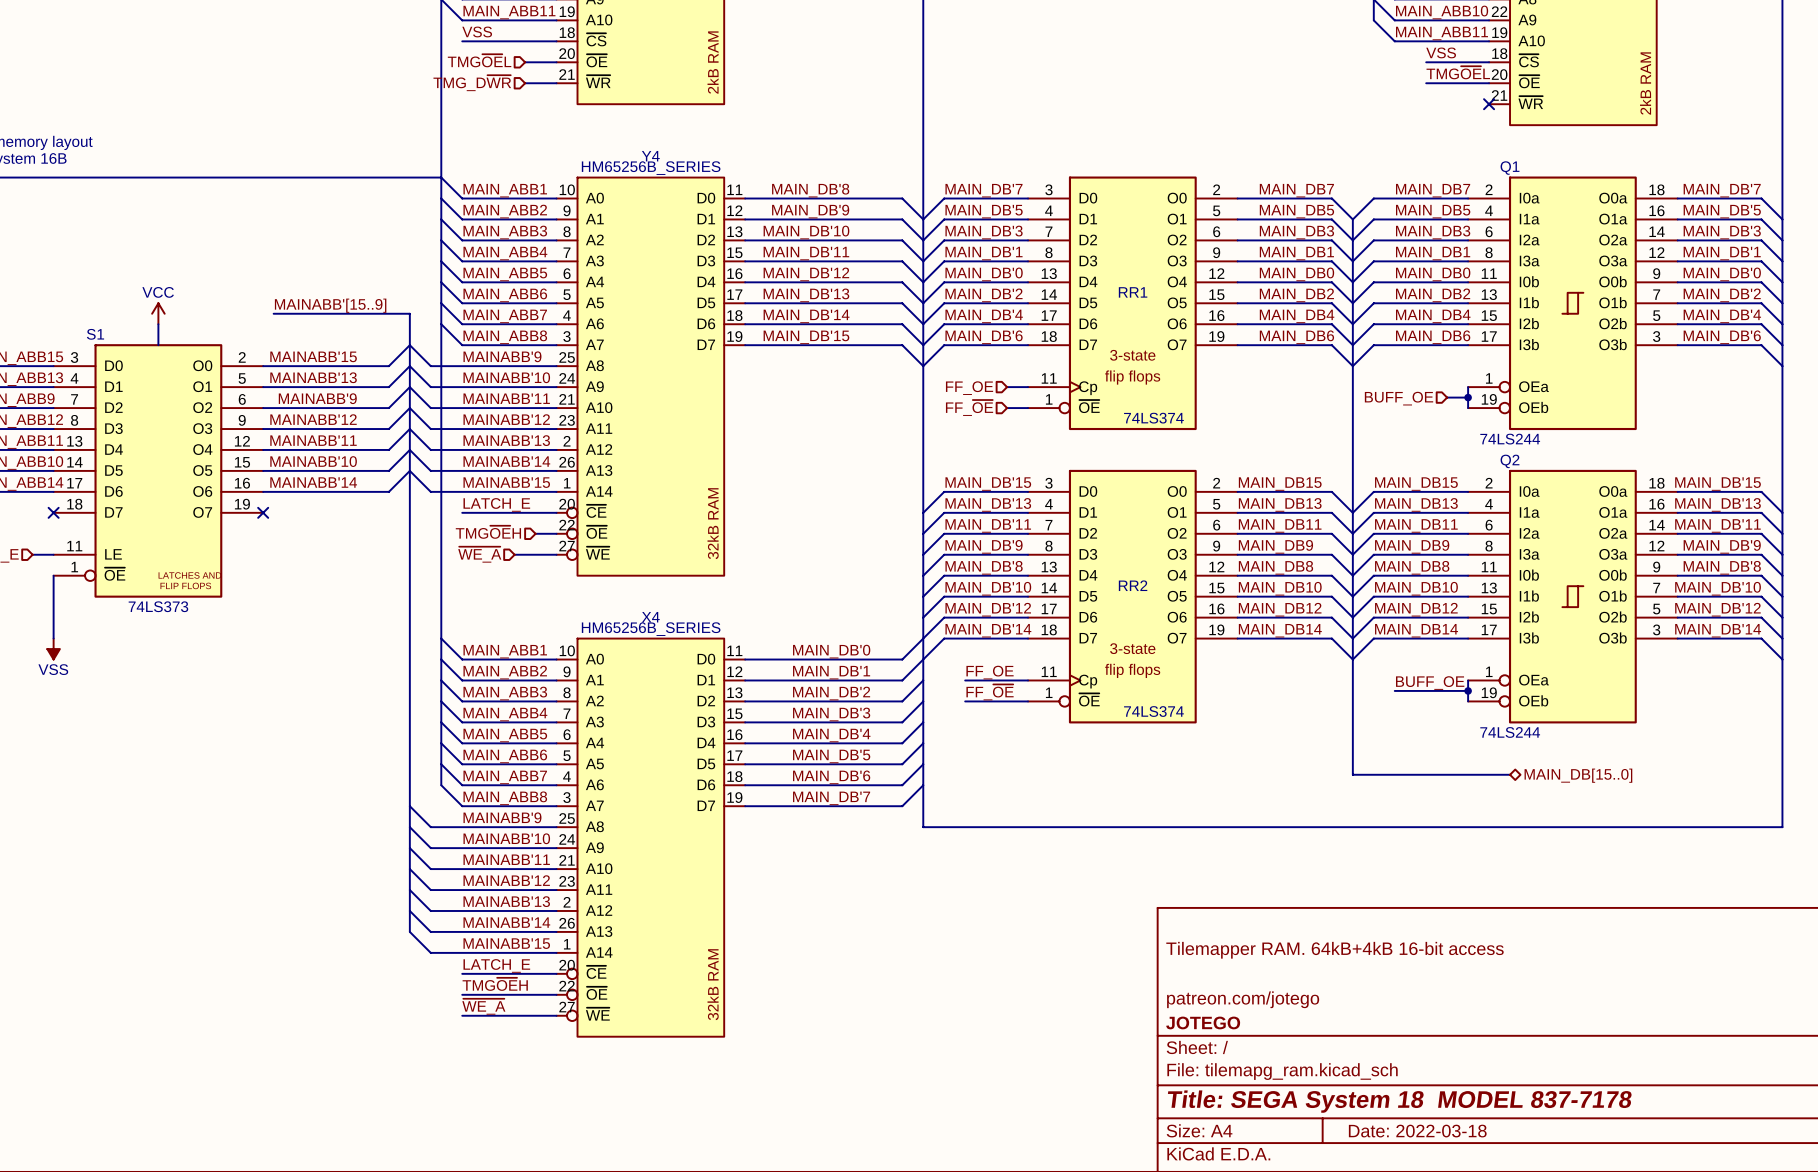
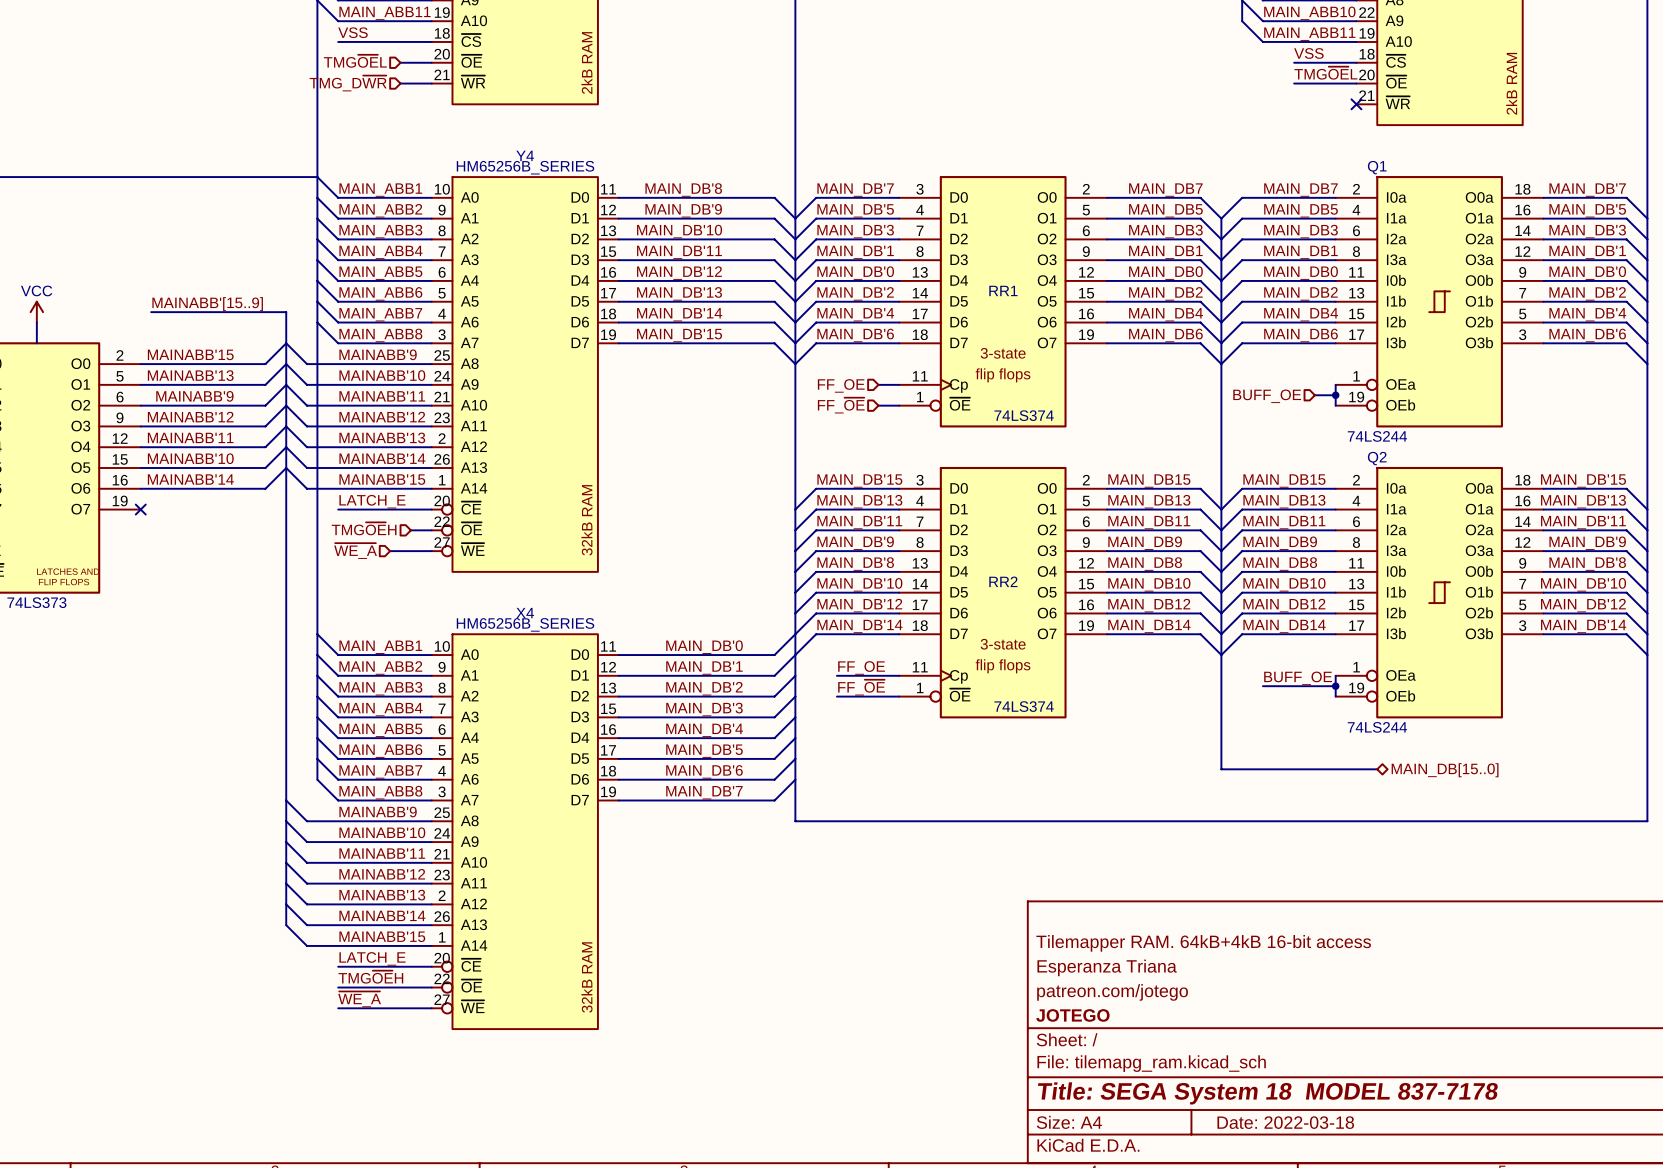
title block: none -> Esperanza Triana (1107, 967)

